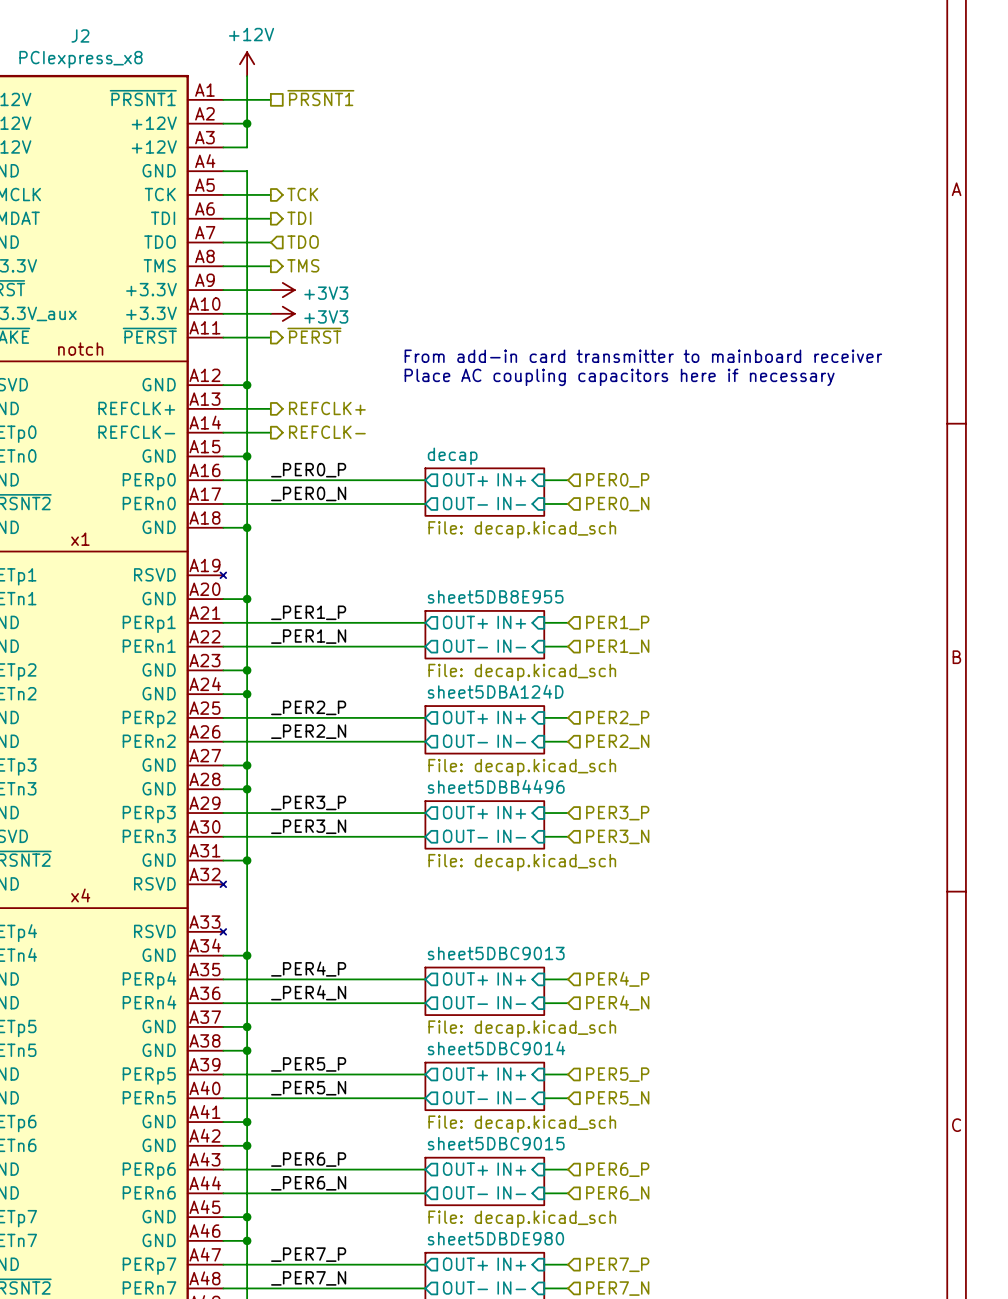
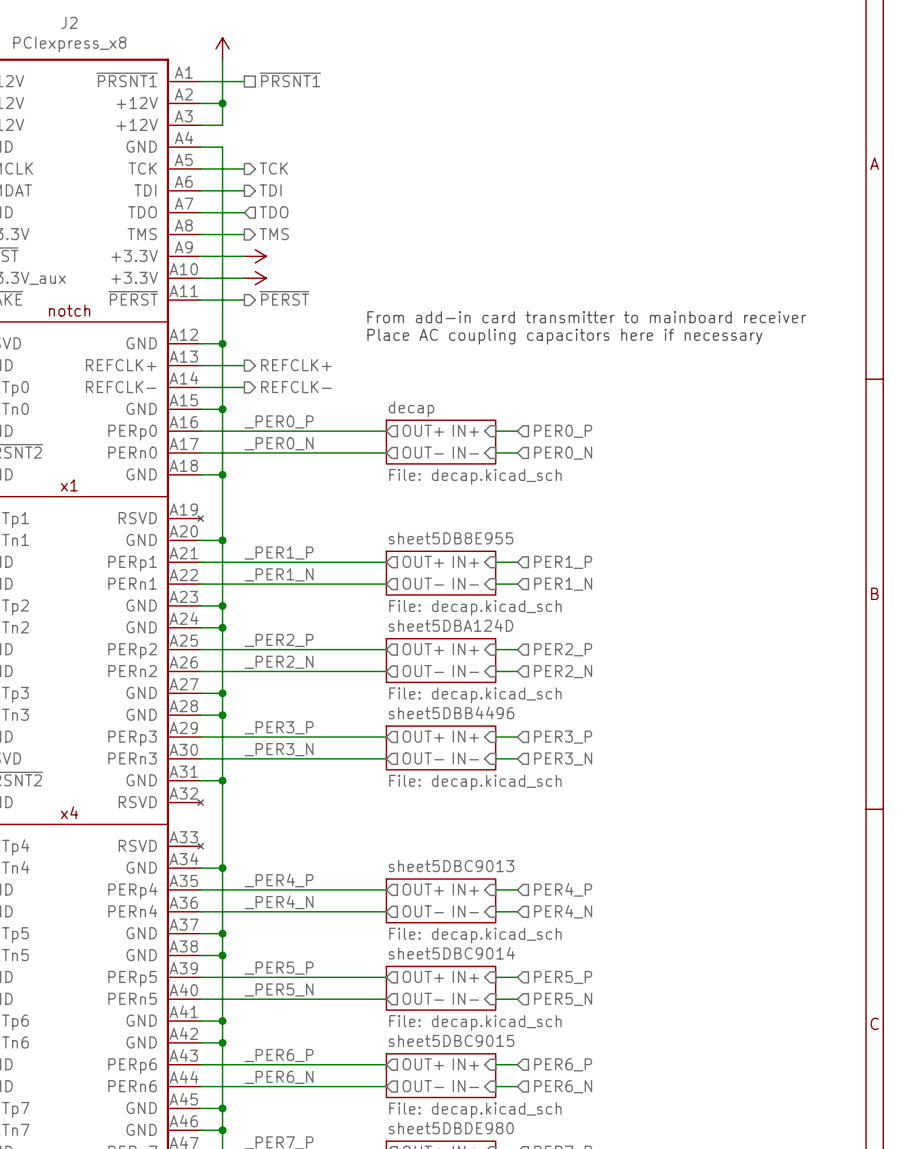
power symbol text: +12V (251, 34) -> none
power symbol text: +3V3 (326, 293) -> none
power symbol text: +3V3 (326, 316) -> none

